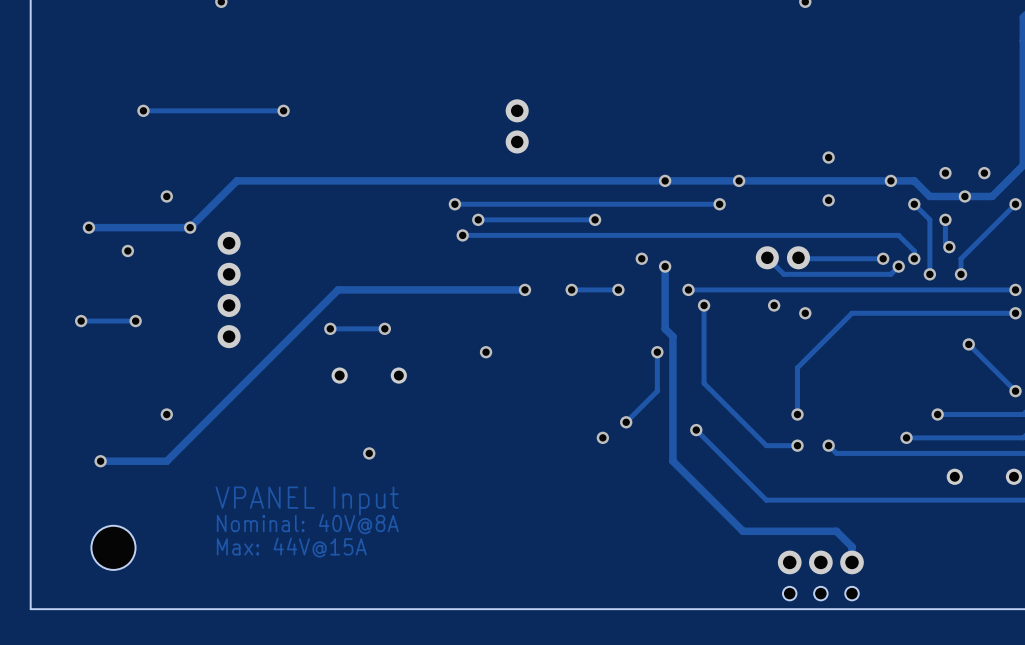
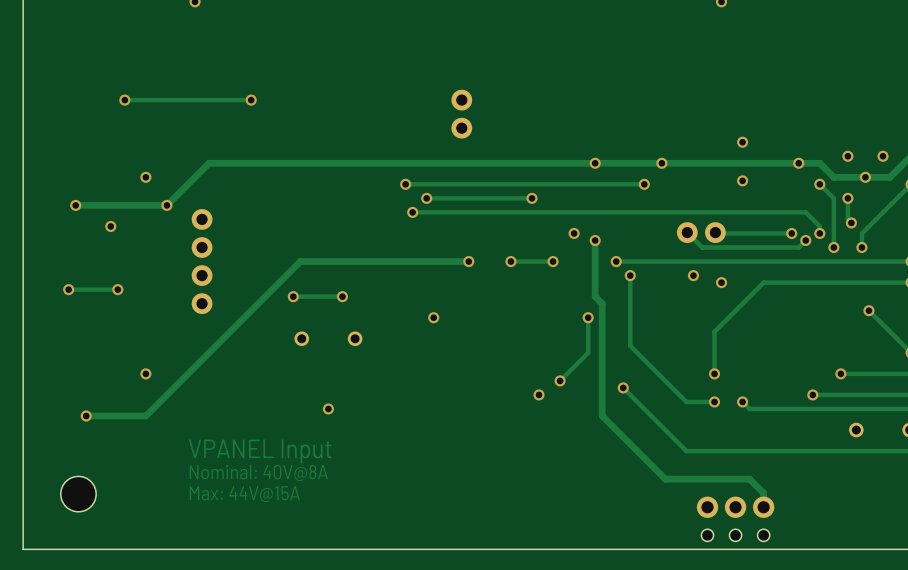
hole: none -> (78, 494)
hole: (113, 547) -> none

